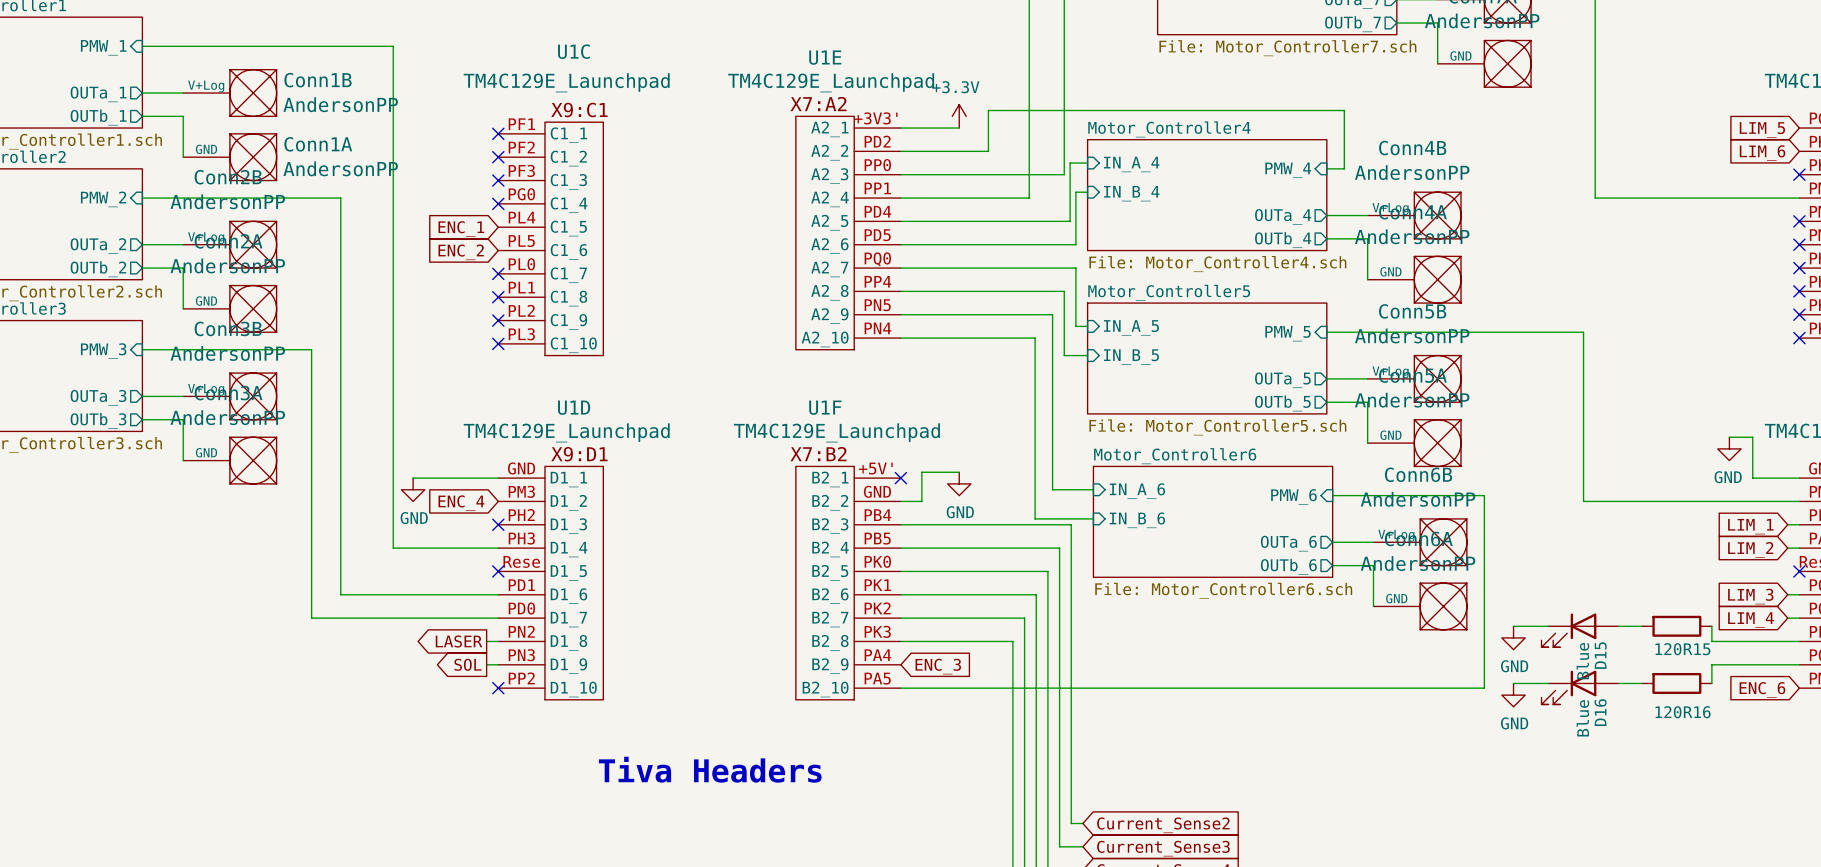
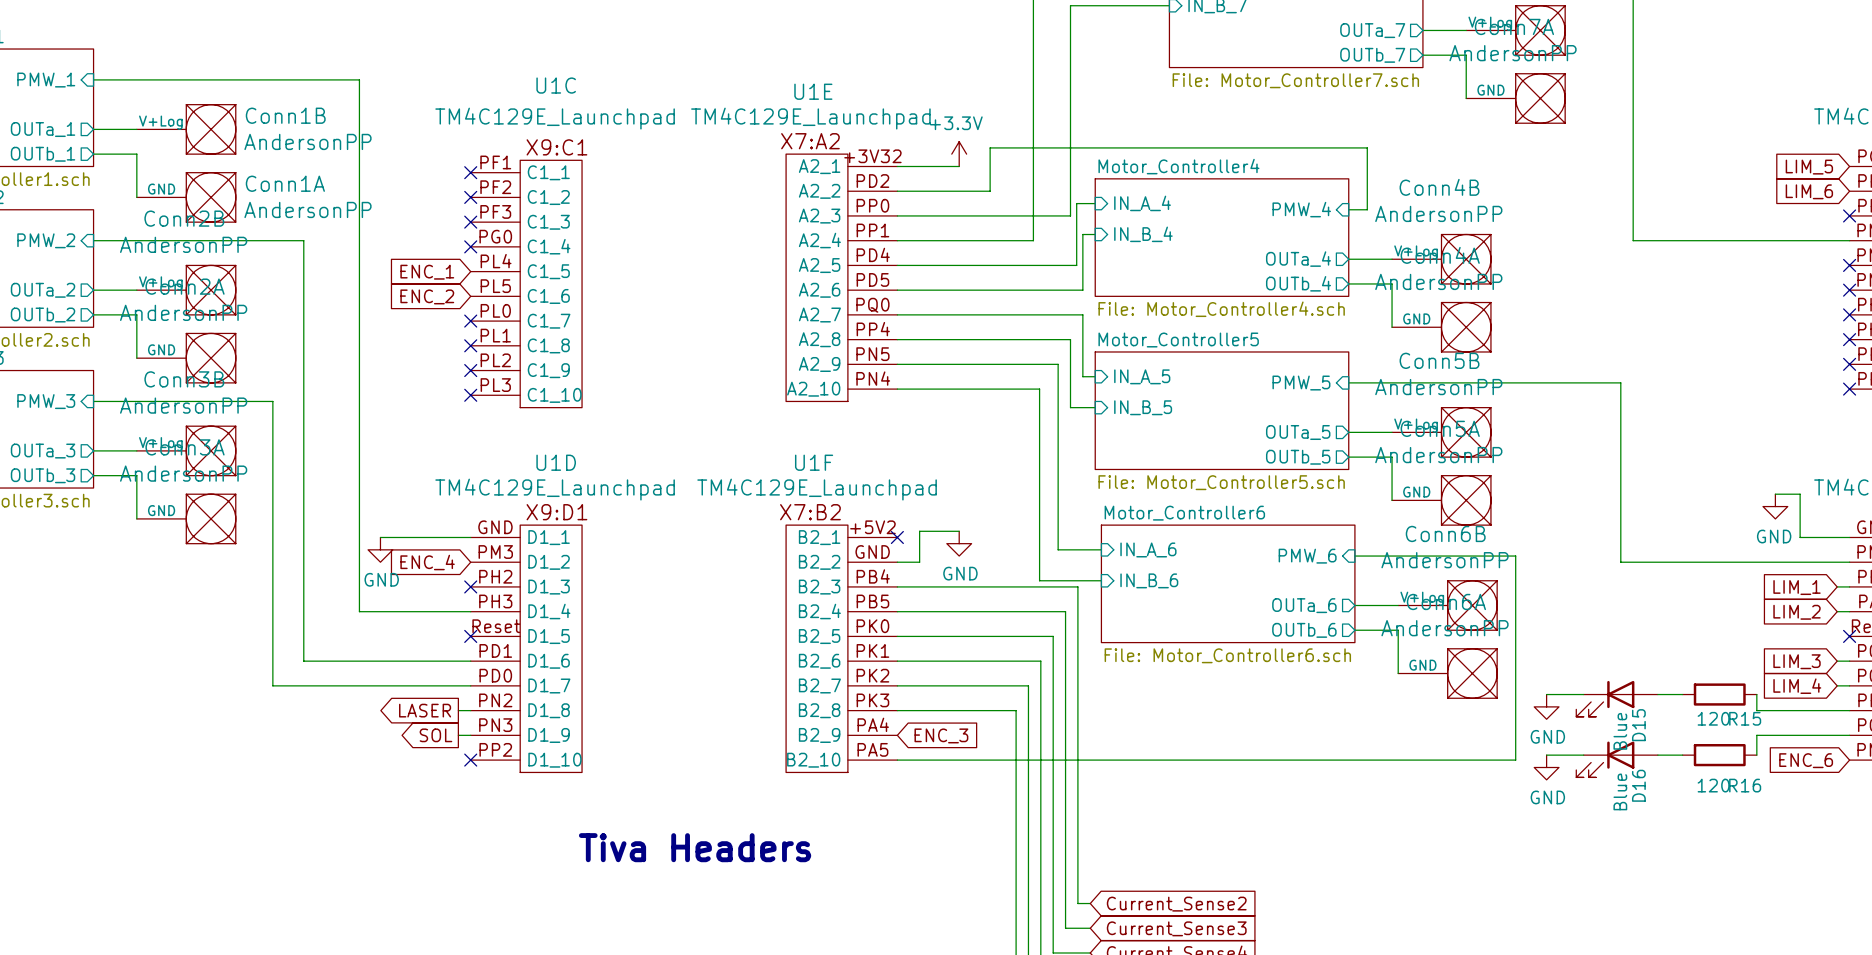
U1E pin number: +3V3' (875, 118) -> +3V32 (872, 156)
U1F pin number: +5V' (875, 468) -> +5V2 (872, 527)
U1D pin number: Rese (521, 561) -> Reset (496, 626)

